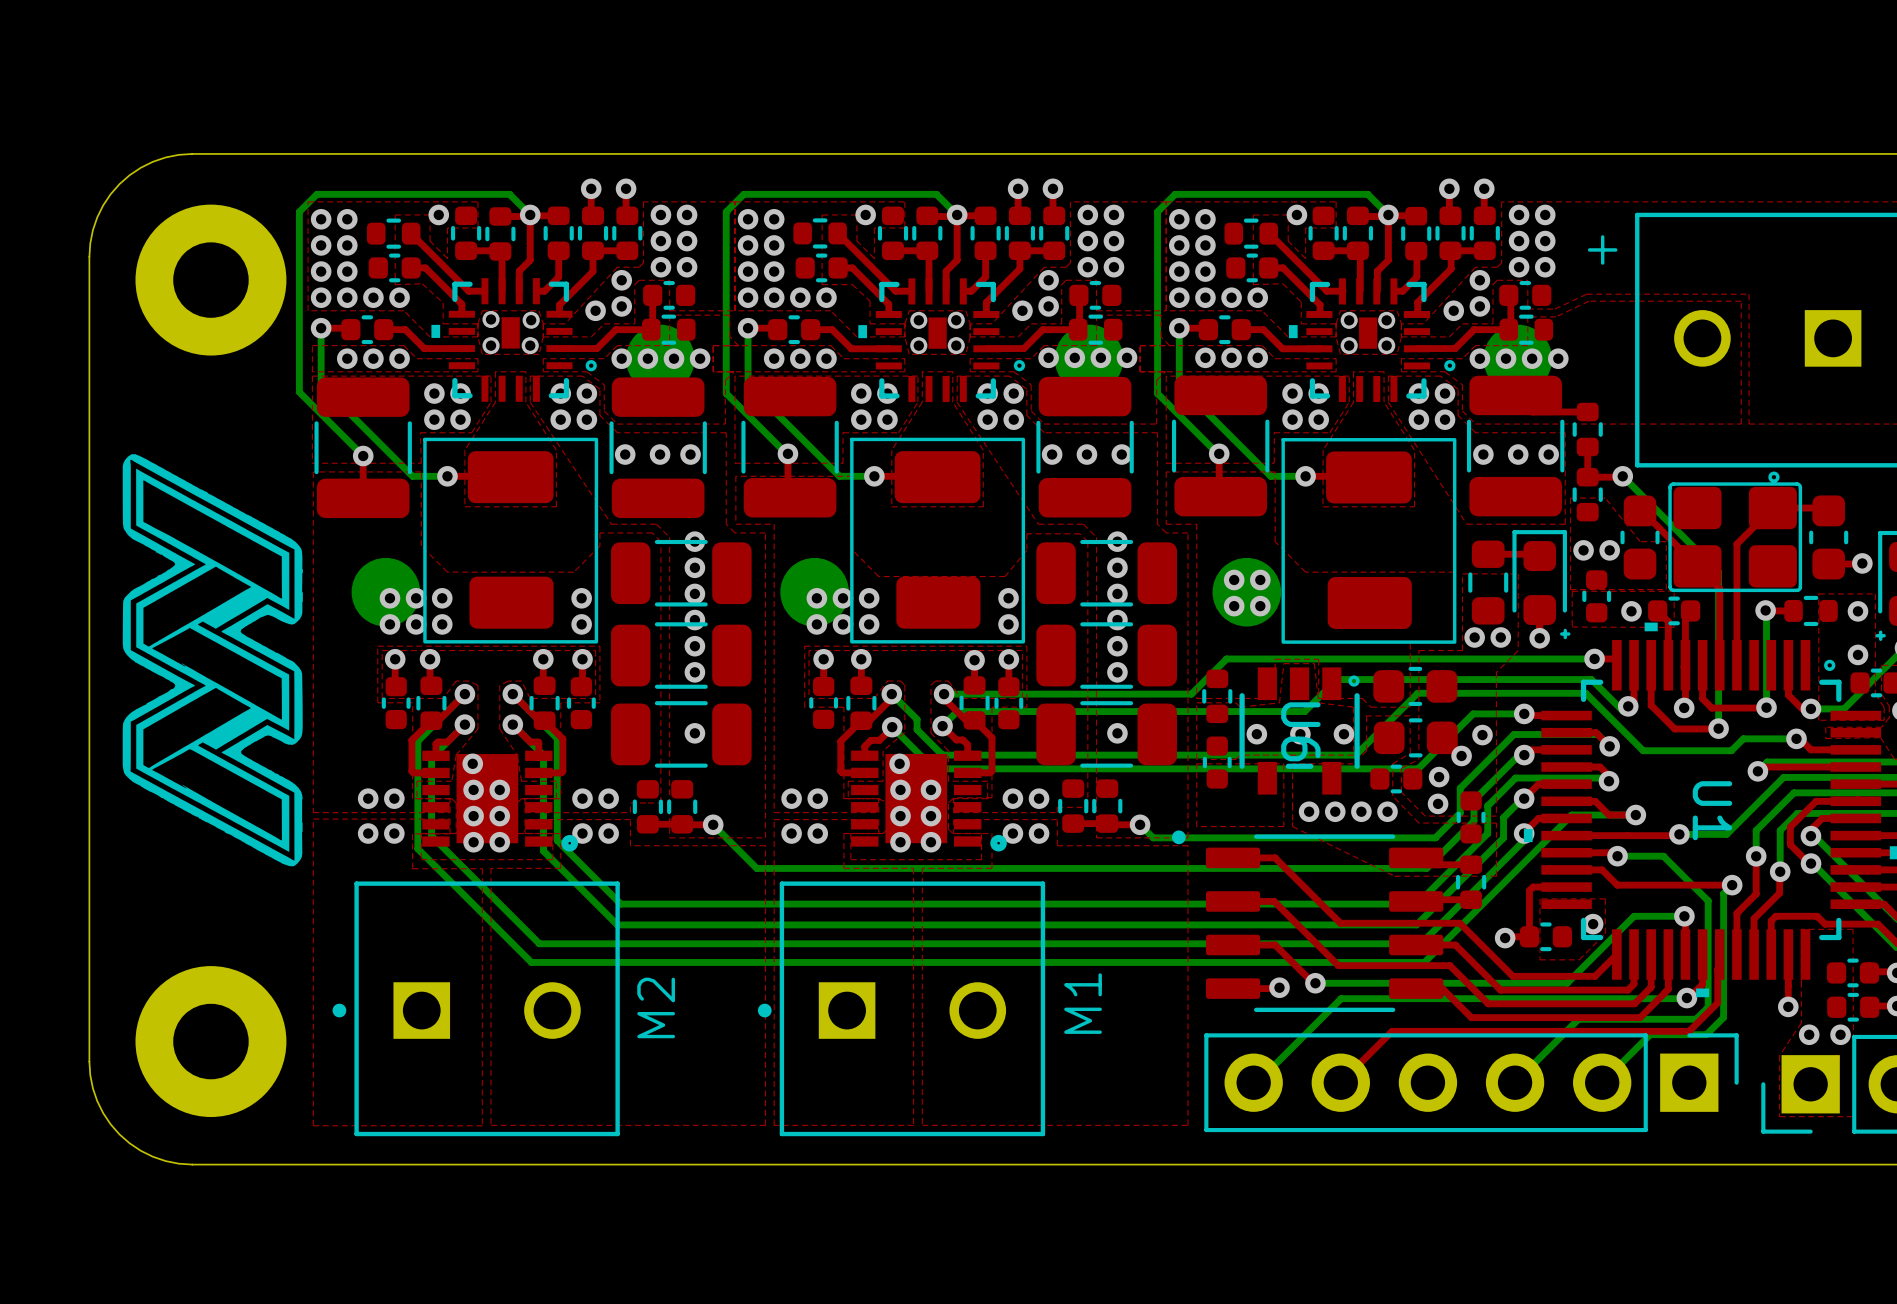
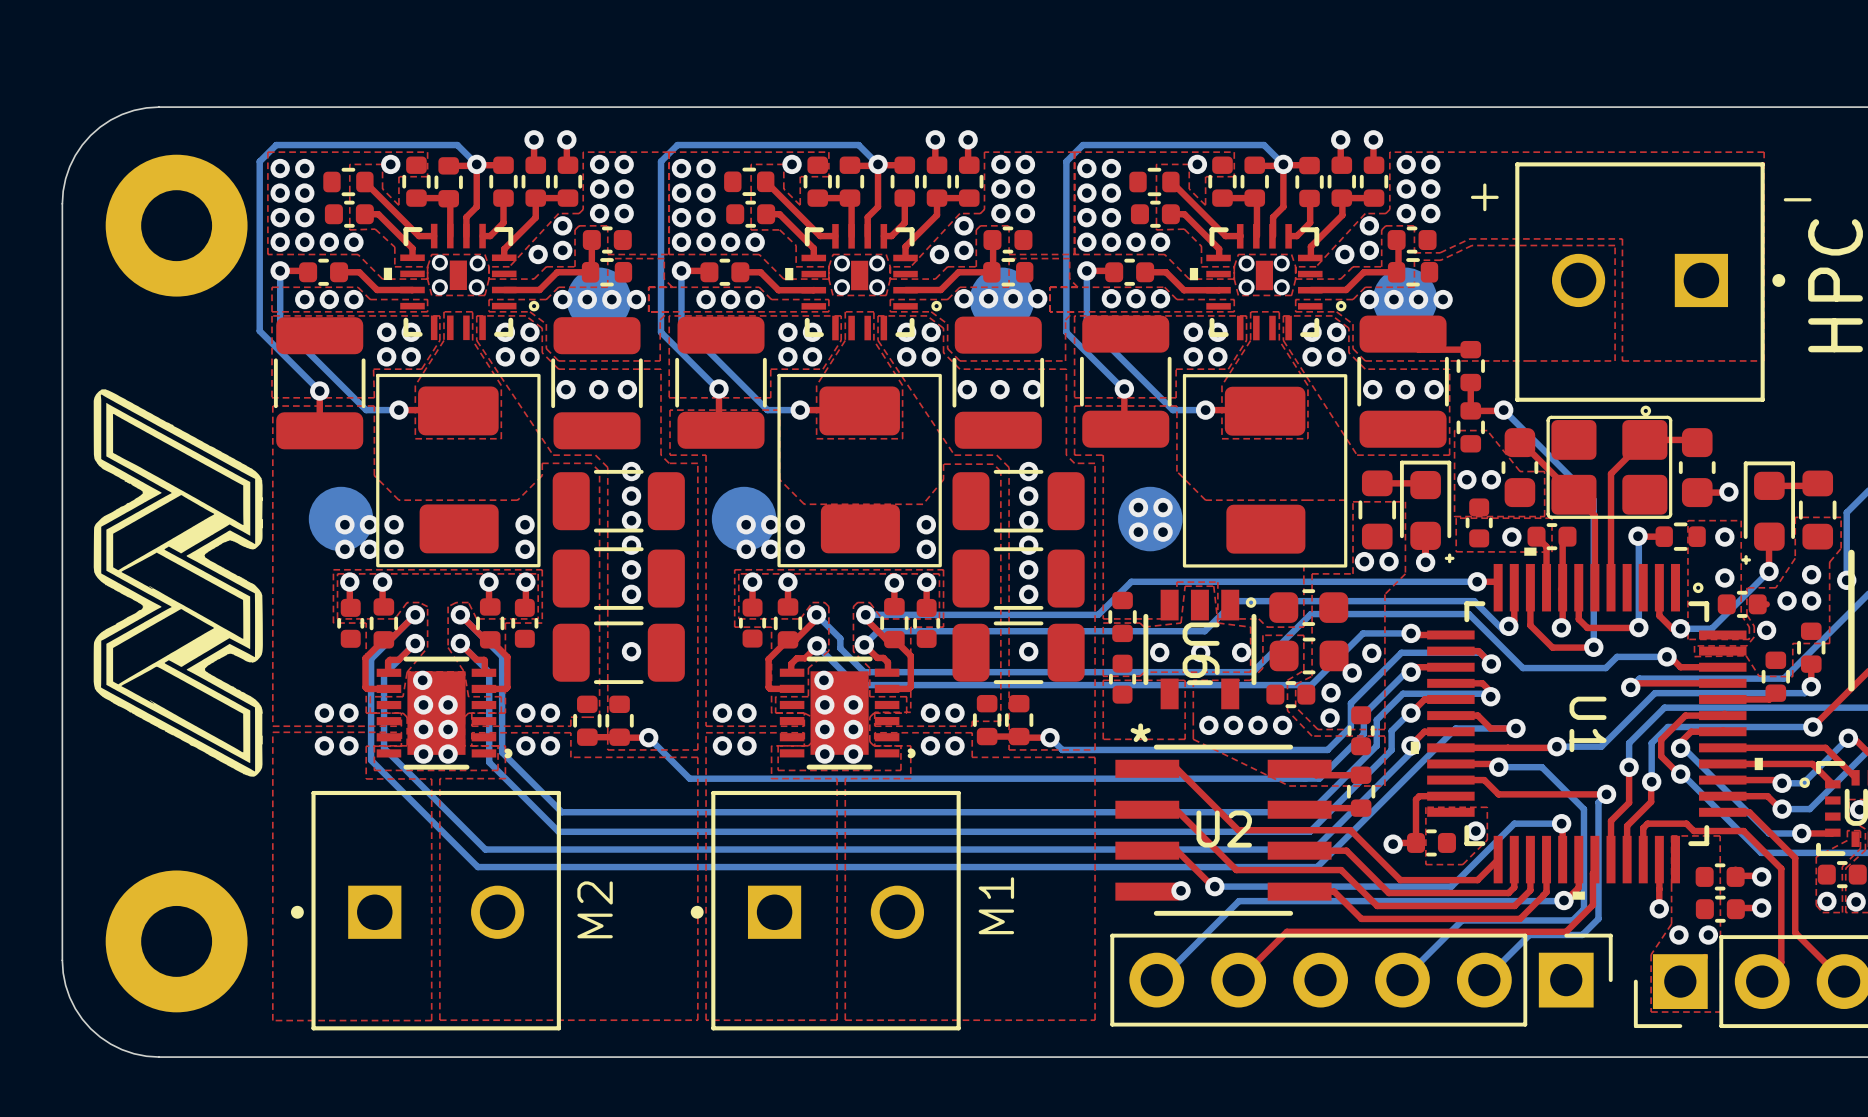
part footprint: [422, 750, 578, 852] -> [376, 656, 513, 770]
part footprint: [851, 750, 1007, 852] -> [779, 656, 916, 770]
part: (1307, 921) -> none
U2: none -> (1223, 830)

